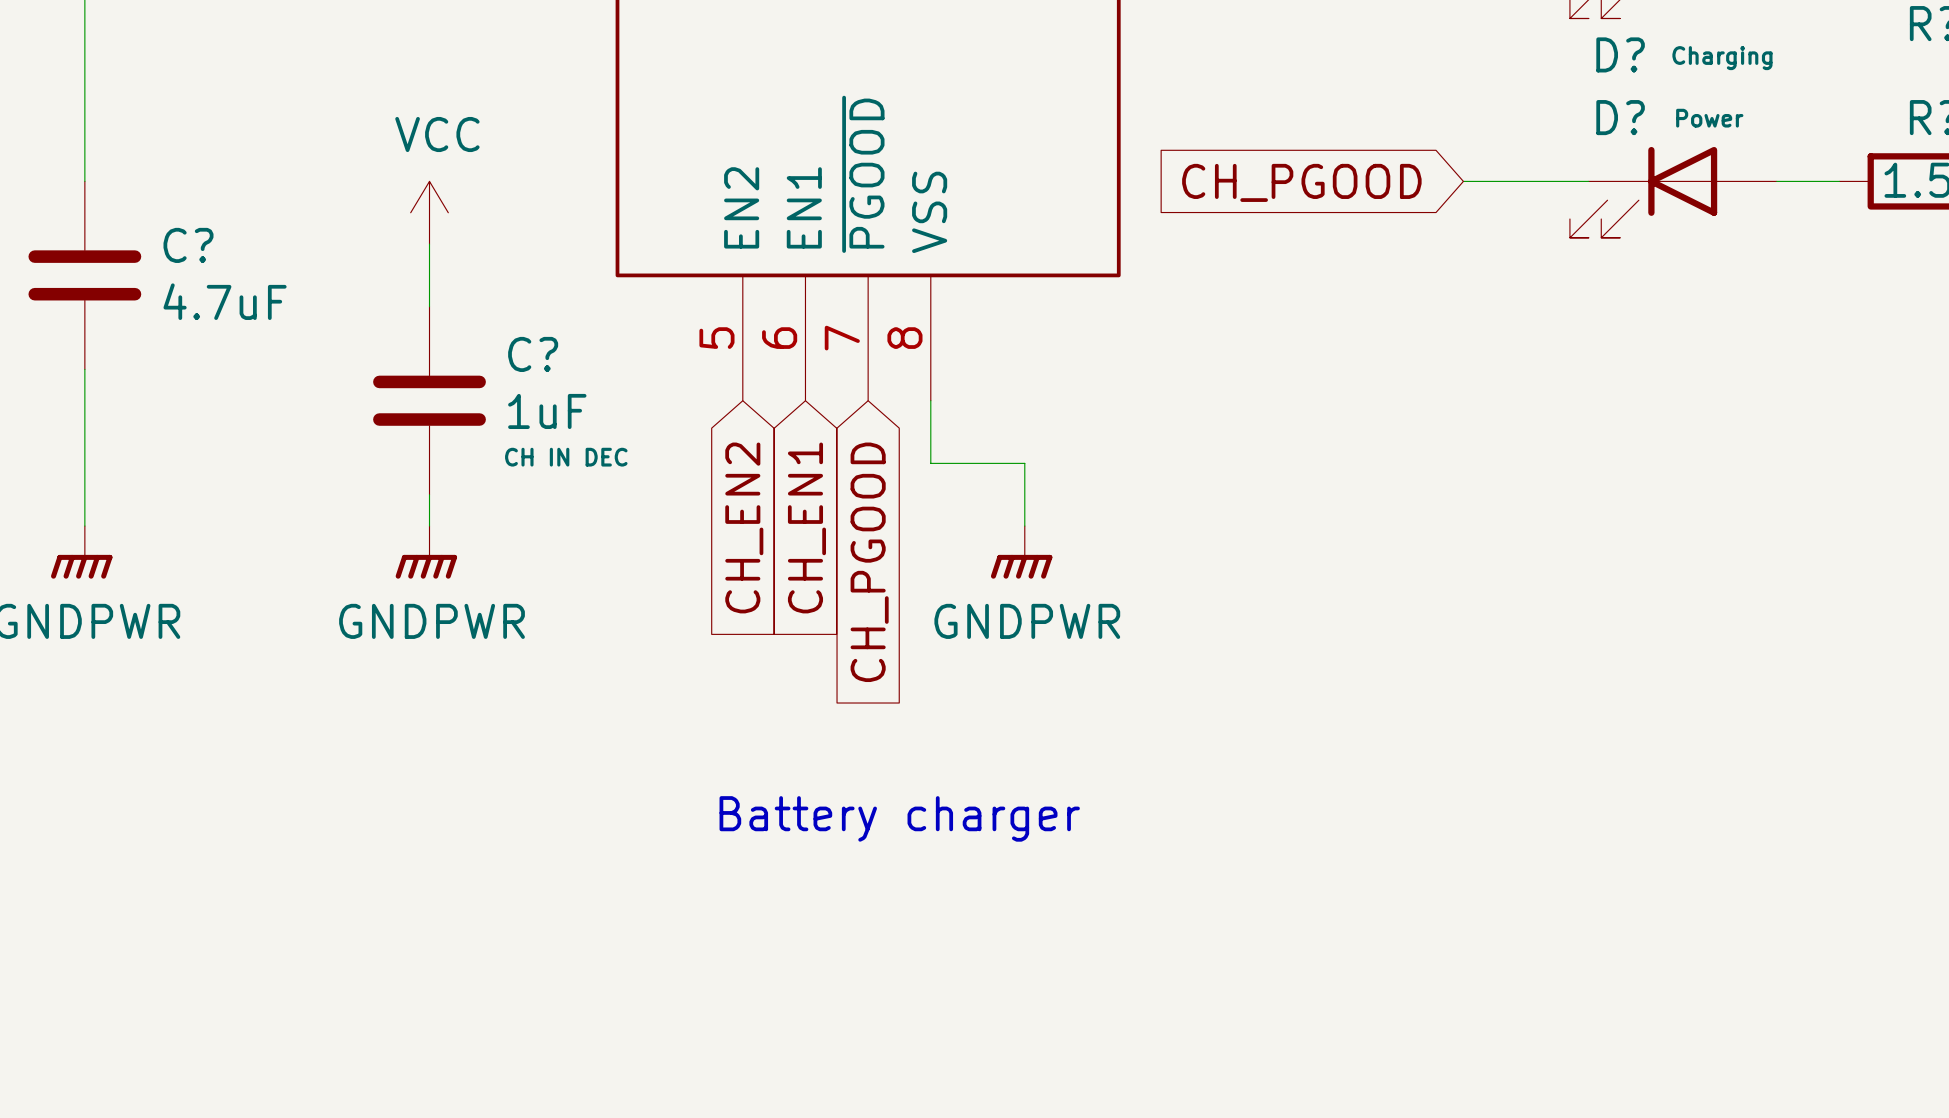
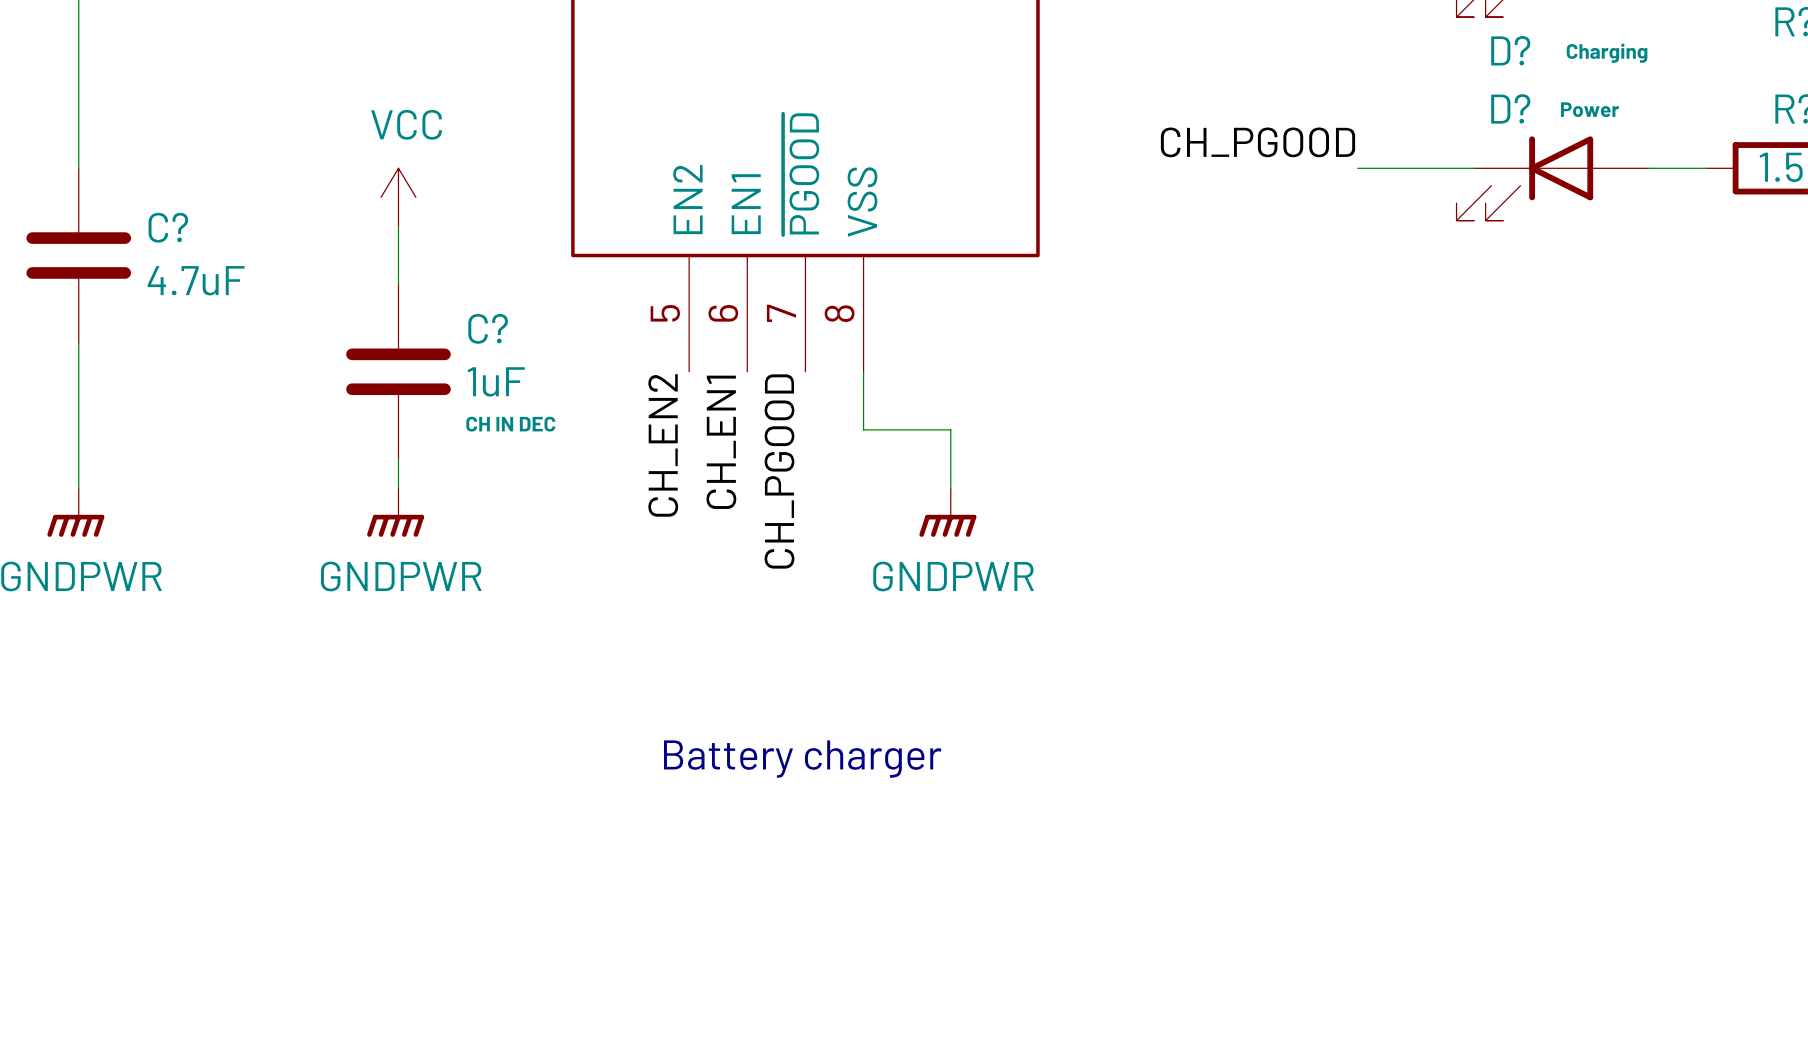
label: none -> CH_PGOOD (1258, 142)
global label: CH_PGOOD (1301, 182) -> none
label: none -> CH_EN2 (663, 445)
label: none -> CH_EN1 (721, 442)
global label: CH_EN2 (744, 527) -> none
global label: CH_EN1 (806, 527) -> none
label: none -> CH_PGOOD (779, 471)
global label: CH_PGOOD (869, 562) -> none

